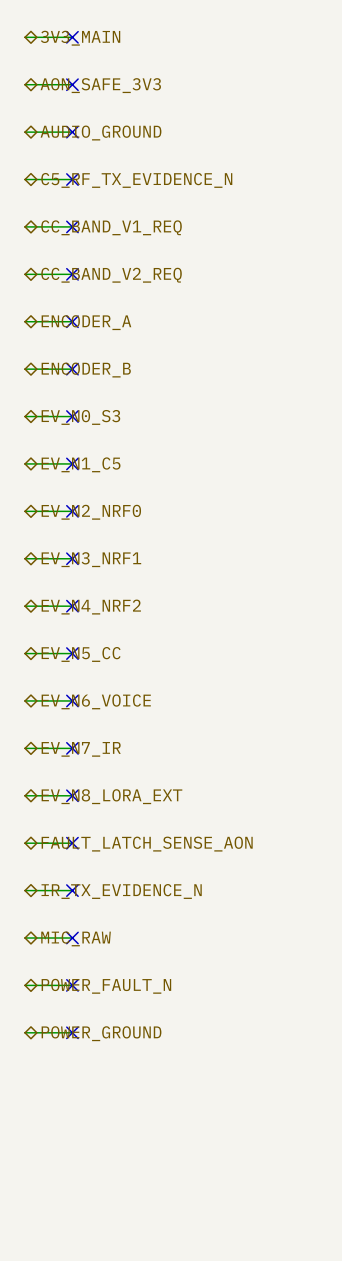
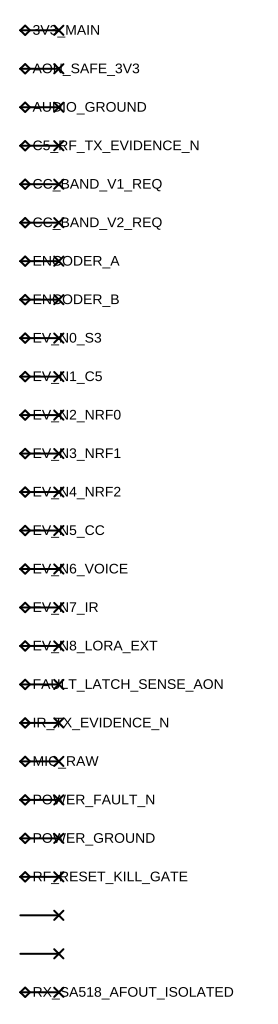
wire: none -> (20, 876) (58, 876)
no-connect mark: none -> (58, 876)
hierarchical label: none -> RF_RESET_KILL_GATE (110, 877)
wire: none -> (20, 915) (58, 915)
no-connect mark: none -> (58, 915)
wire: none -> (20, 953) (58, 953)
no-connect mark: none -> (58, 953)
wire: none -> (20, 992) (58, 992)
no-connect mark: none -> (58, 992)
hierarchical label: none -> RX_SA518_AFOUT_ISOLATED (133, 993)

